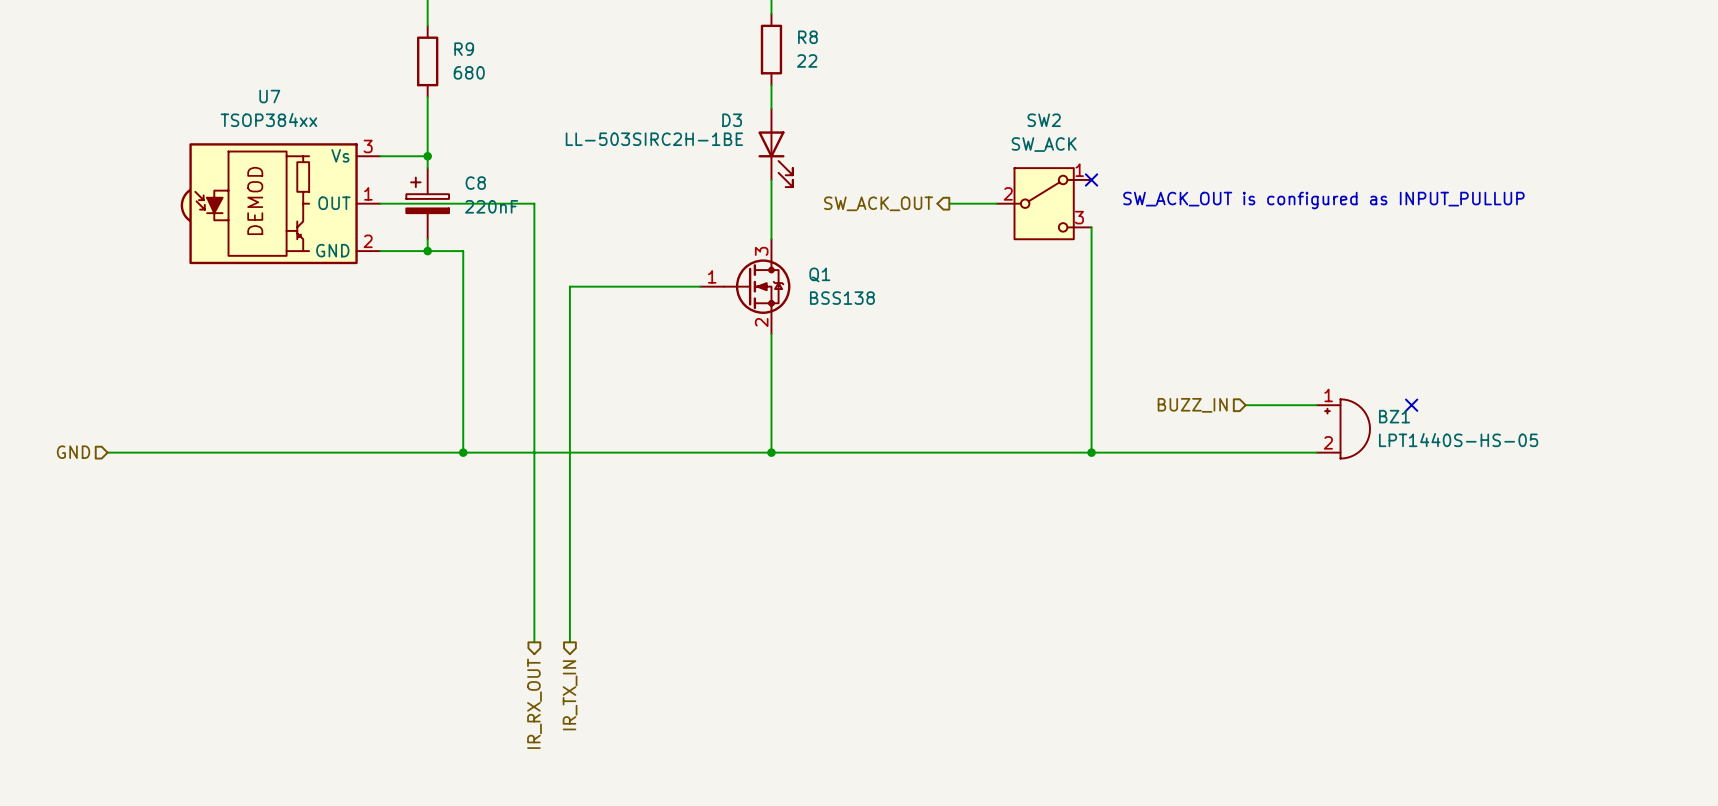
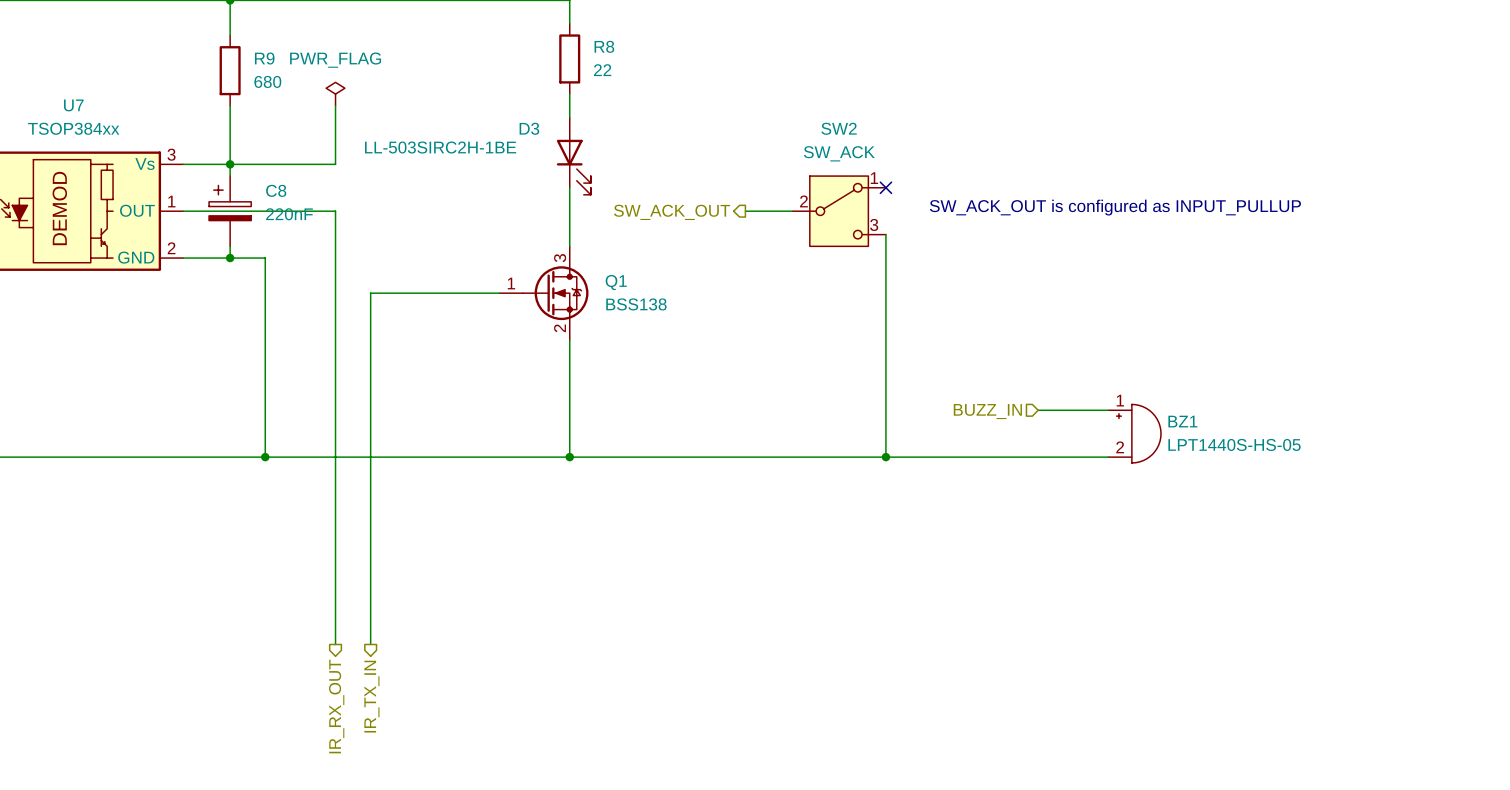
power symbol: none -> PWR_FLAG (335, 94)
wire: none -> (335, 105) (335, 164) (230, 164)
no-connect mark: (1411, 405) -> none

